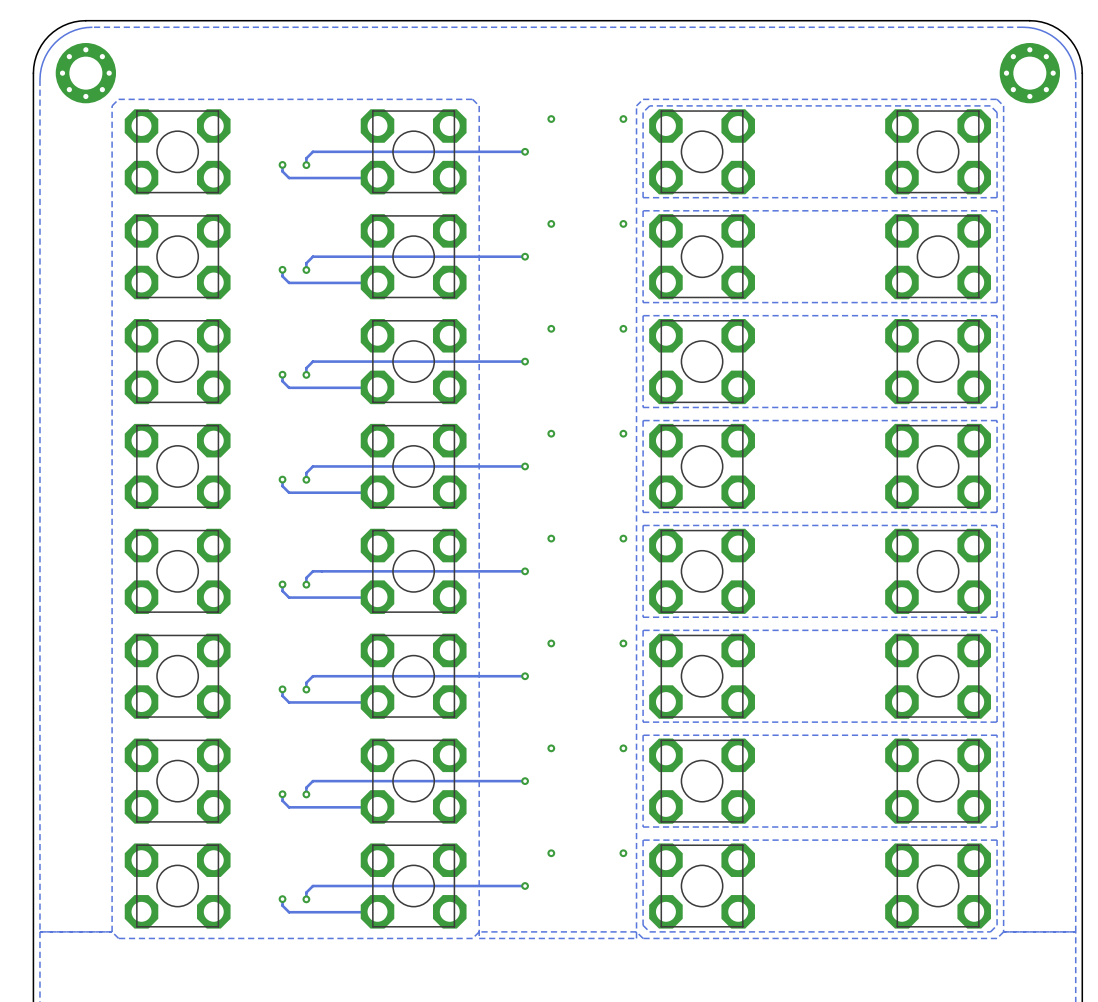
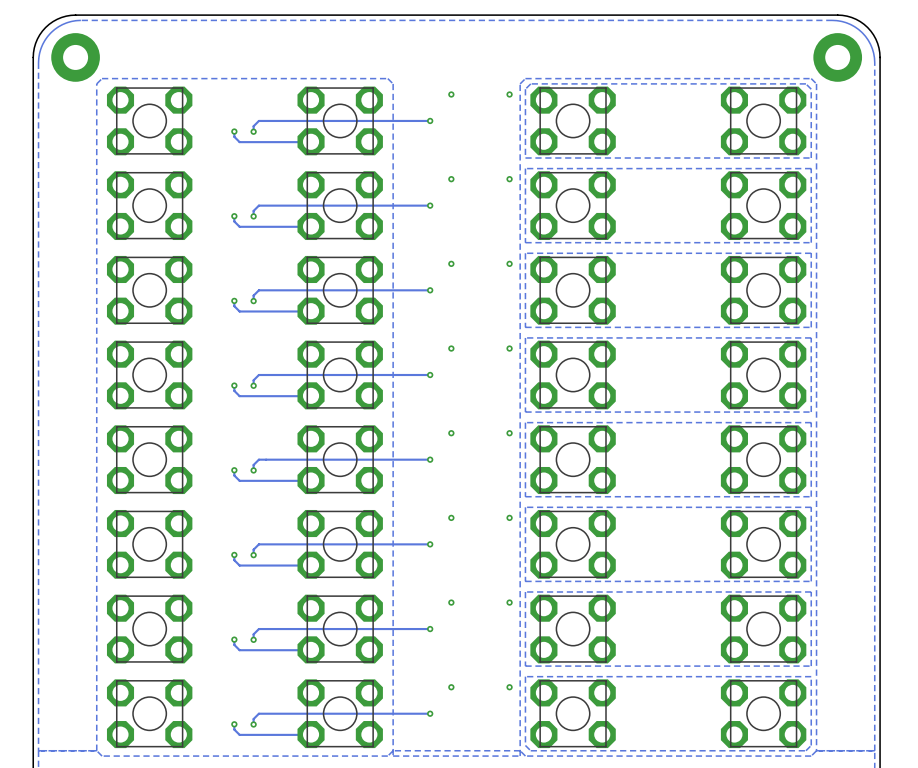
part footprint: [55, 42, 117, 104] -> [51, 33, 100, 82]
part footprint: [999, 42, 1061, 104] -> [813, 33, 863, 82]

